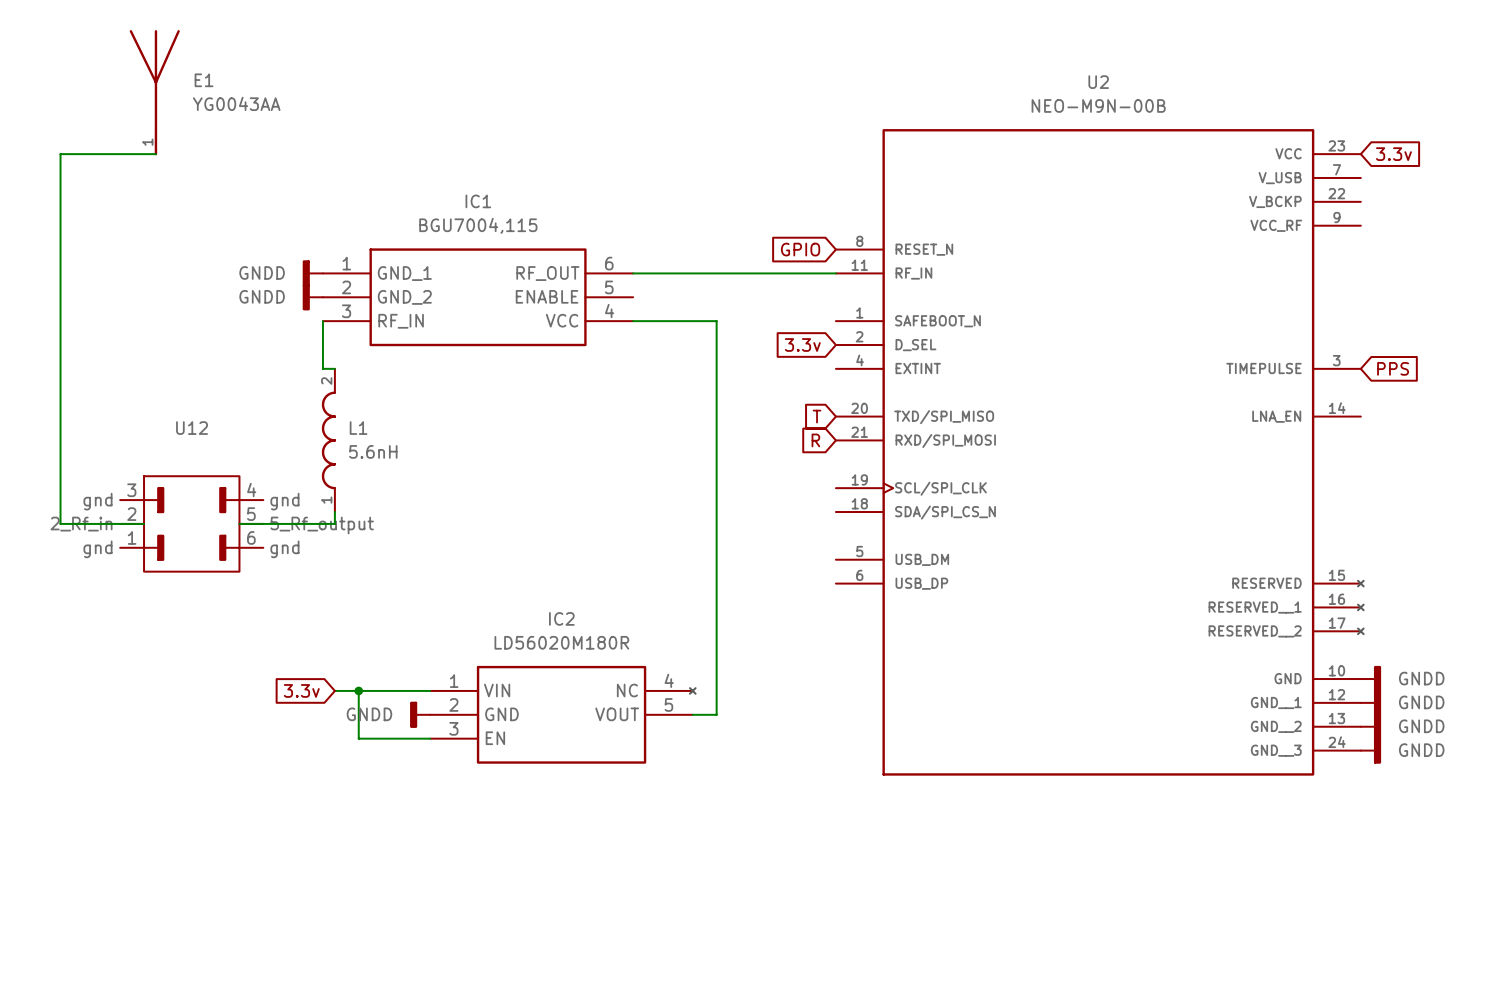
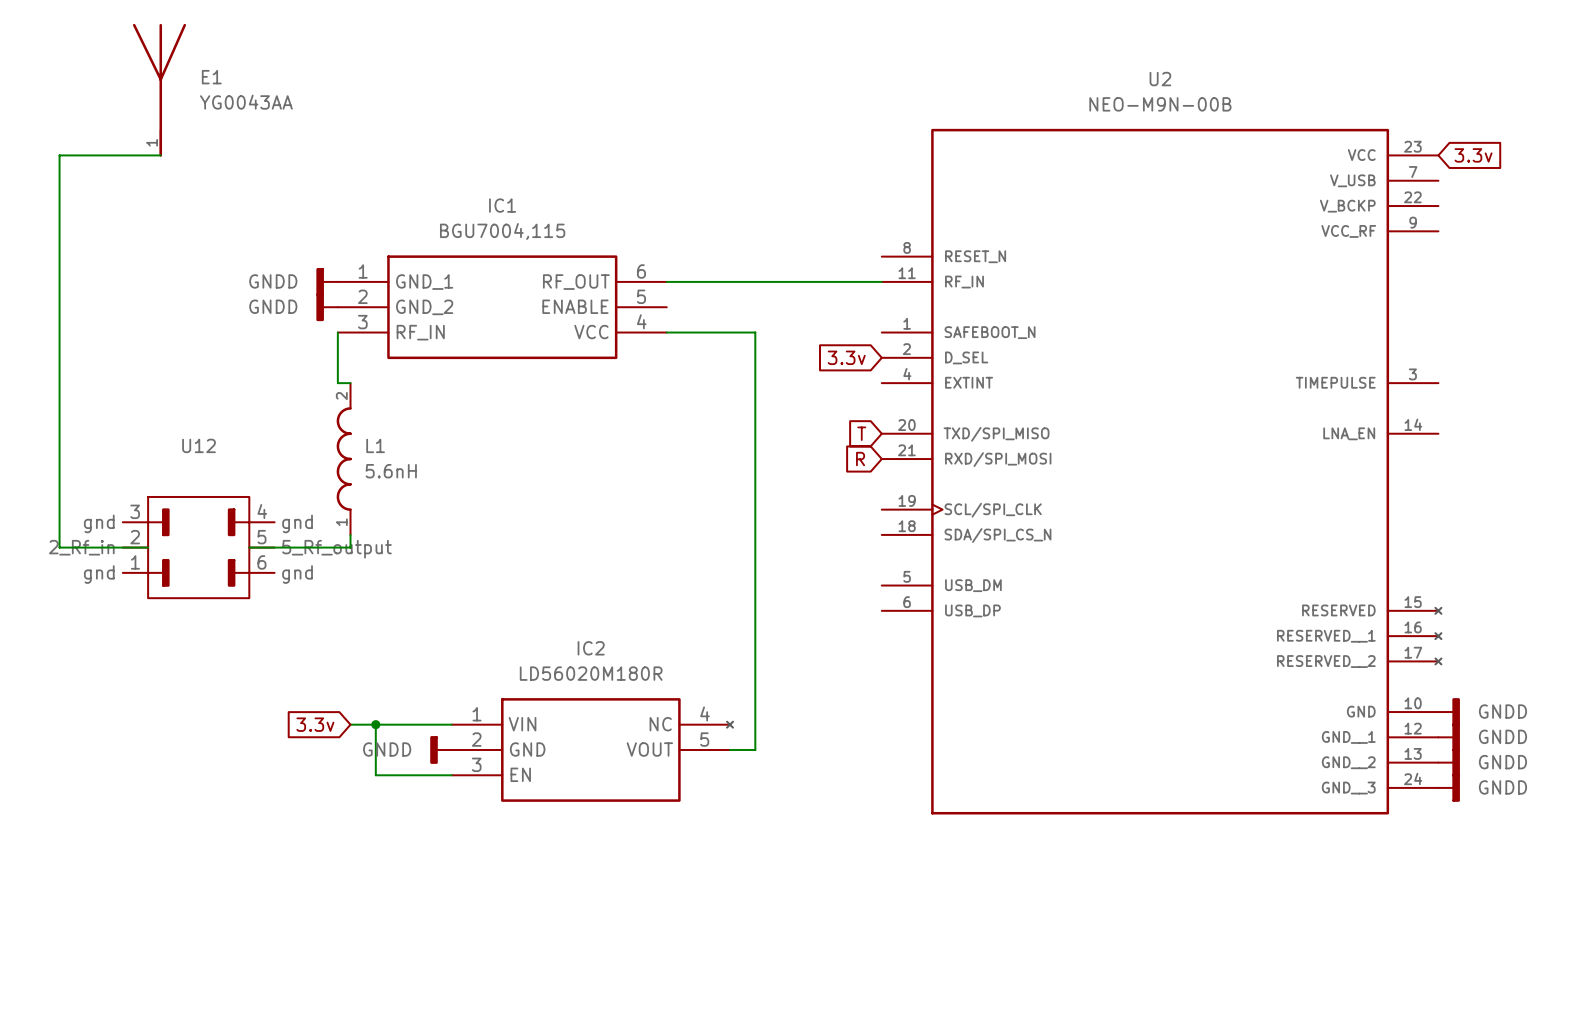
global label: GPIO (800, 249) -> none
global label: PPS (1393, 368) -> none

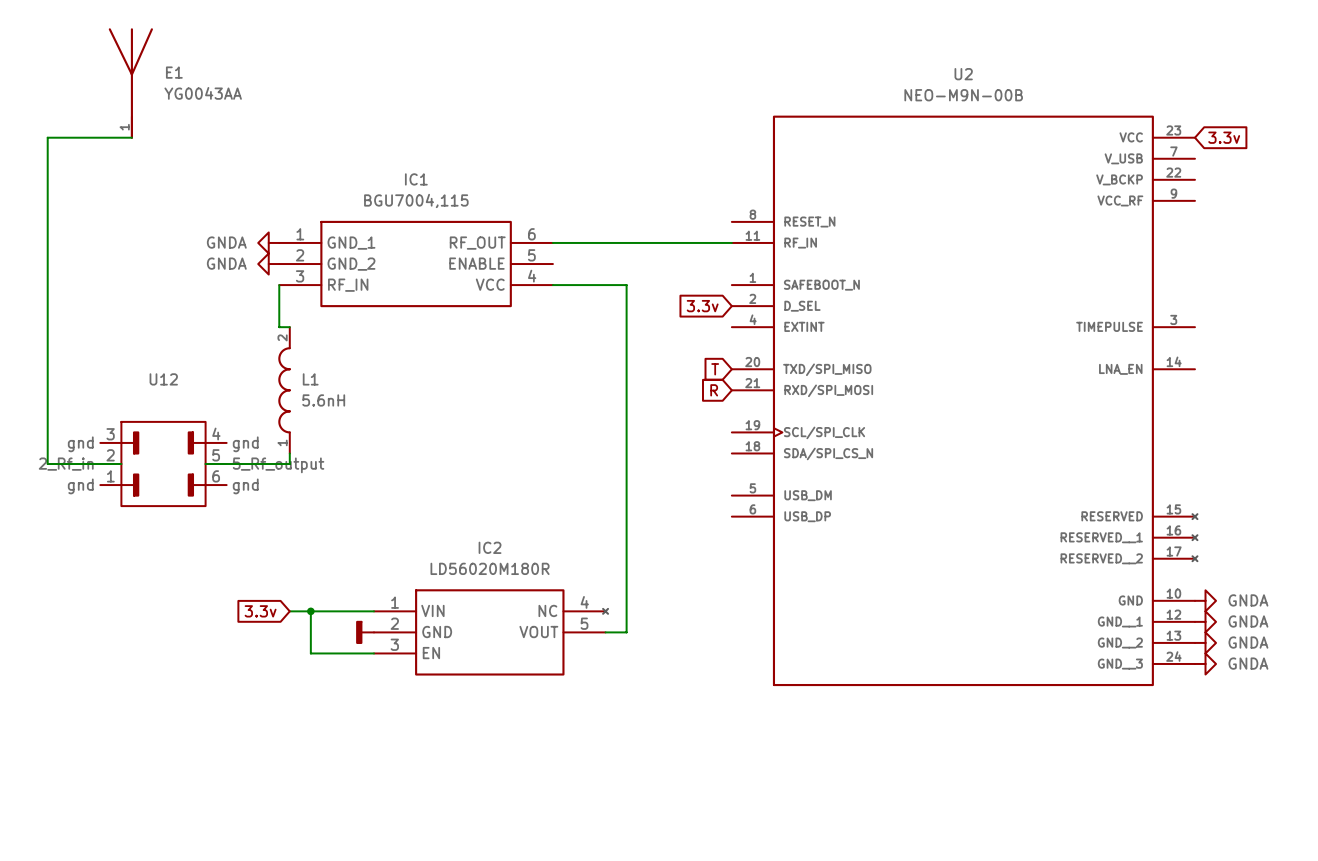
power symbol: GNDD (327, 281) -> GNDA (268, 242)
power symbol: GNDD (327, 307) -> GNDA (268, 264)
power symbol: GNDD (1449, 712) -> GNDA (1205, 600)
power symbol: GNDD (1449, 737) -> GNDA (1205, 621)
power symbol text: GNDD (387, 749) -> none
power symbol: GNDD (1449, 762) -> GNDA (1205, 642)
power symbol: GNDD (1449, 787) -> GNDA (1205, 663)

